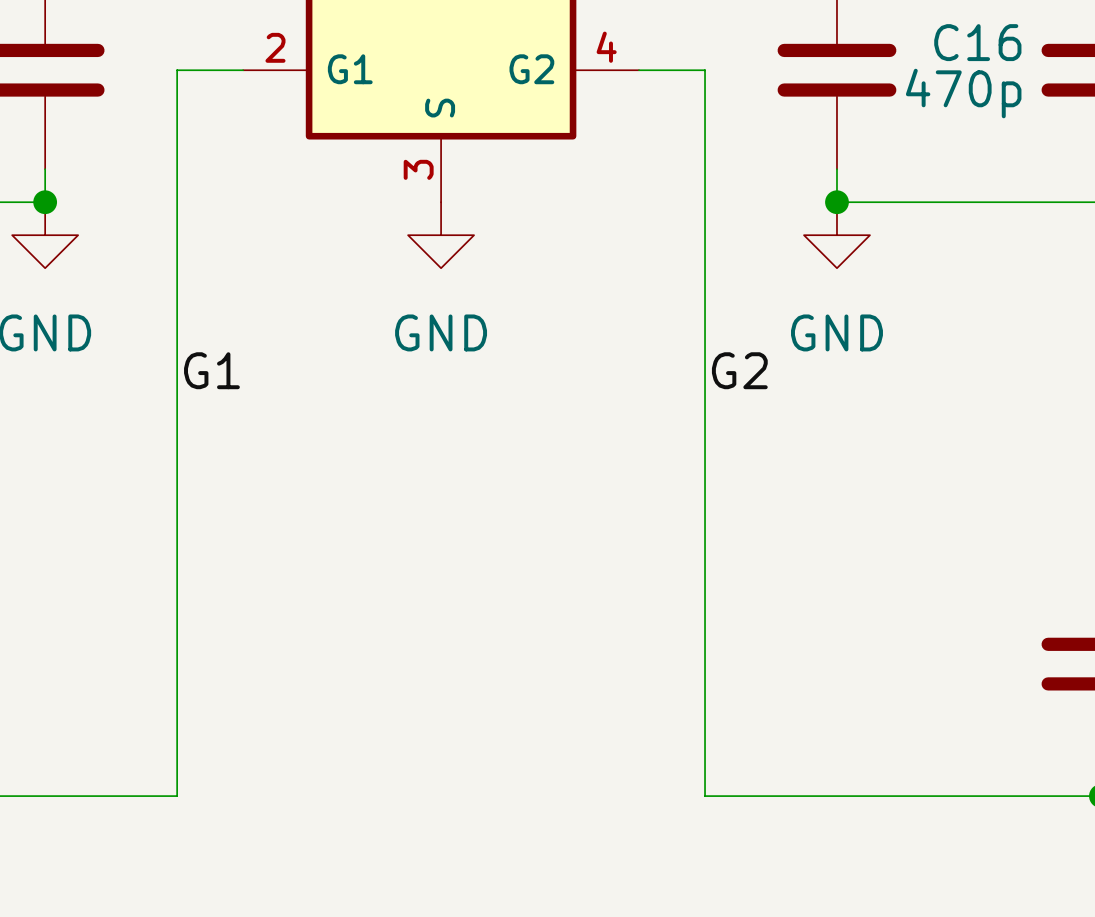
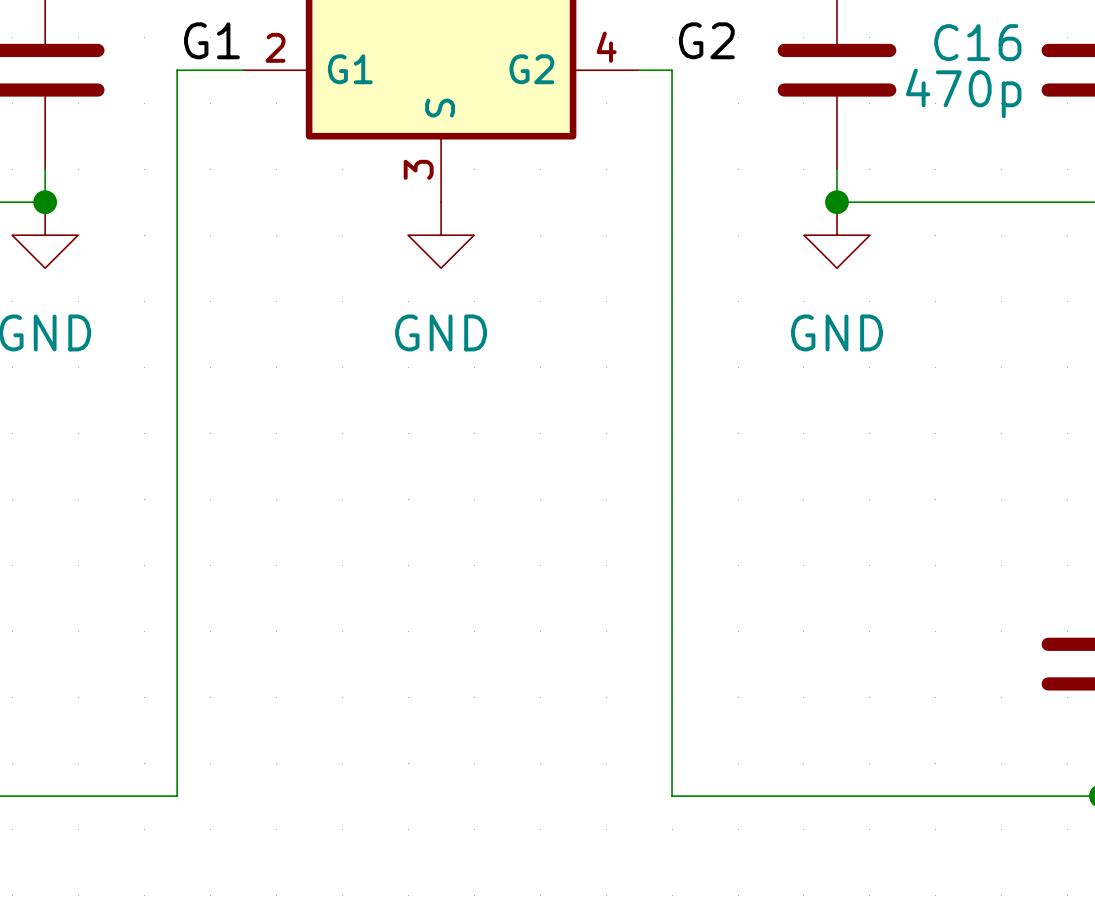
wire: (672, 70) (705, 70) (705, 796) -> (672, 70) (672, 796) (705, 796)
label position: G1 (211, 370) -> G1 (211, 40)
label position: G2 (739, 370) -> G2 (706, 40)

